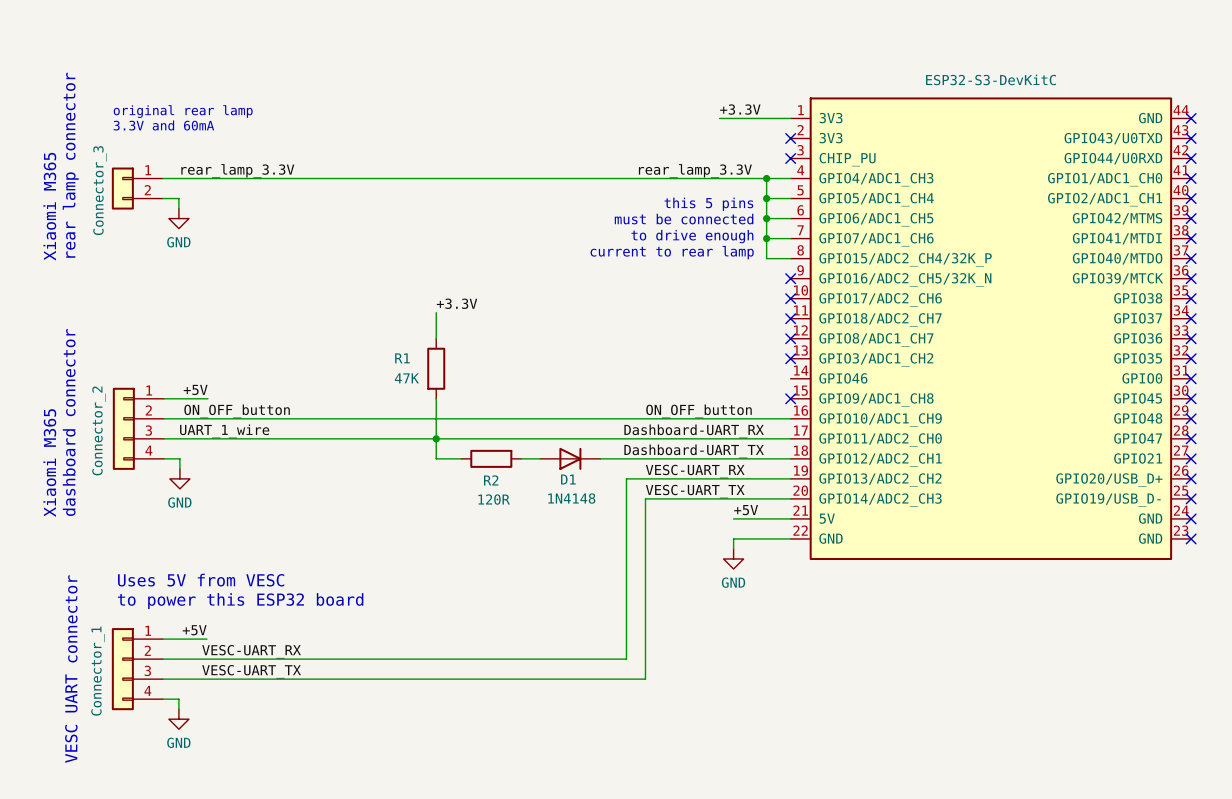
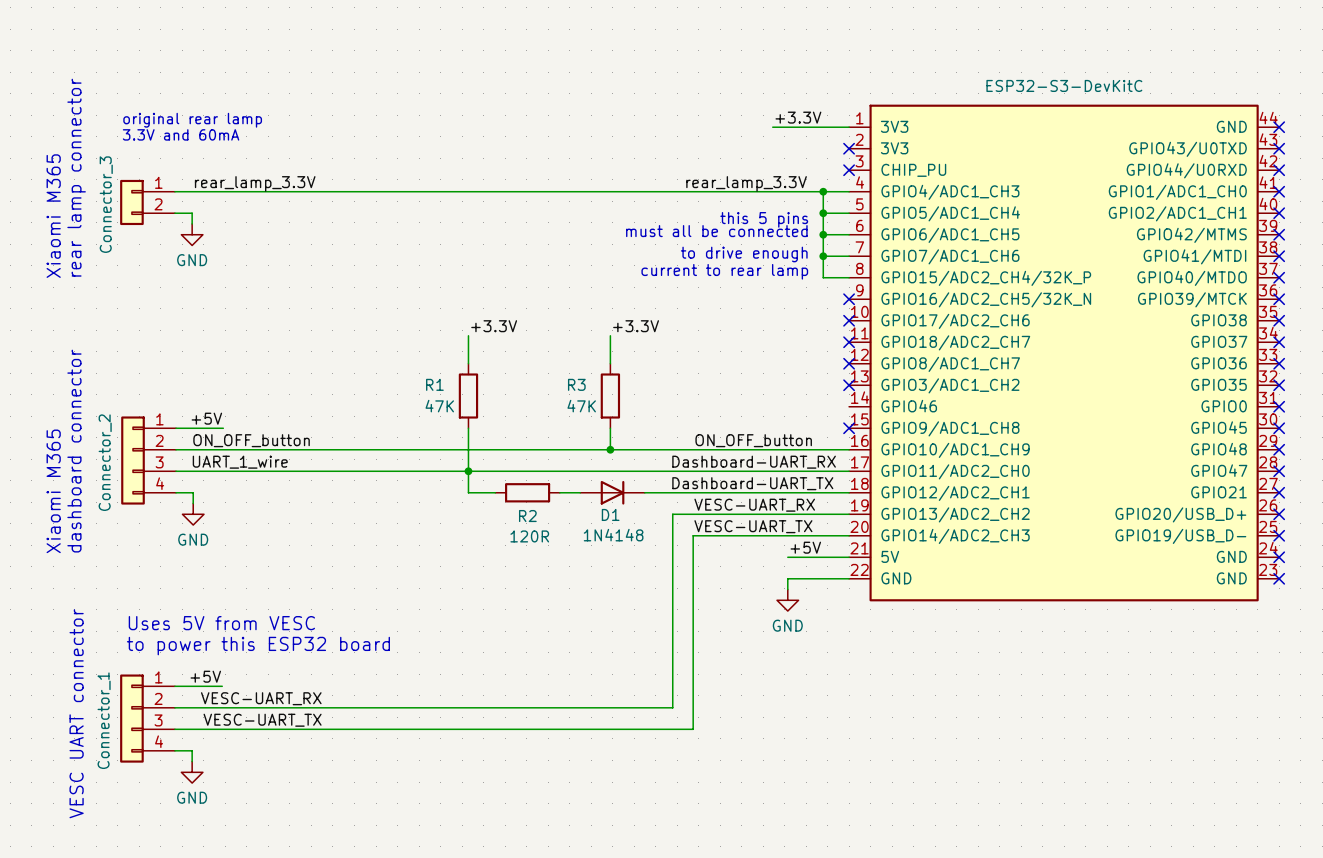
text: must be connected (684, 219) -> must all be connected (716, 231)
label: none -> +3.3V (636, 326)
wire: none -> (610, 335) (610, 363)
R3: none -> 47K (610, 396)
wire: none -> (610, 428) (610, 449)
junction: none -> (610, 449)

